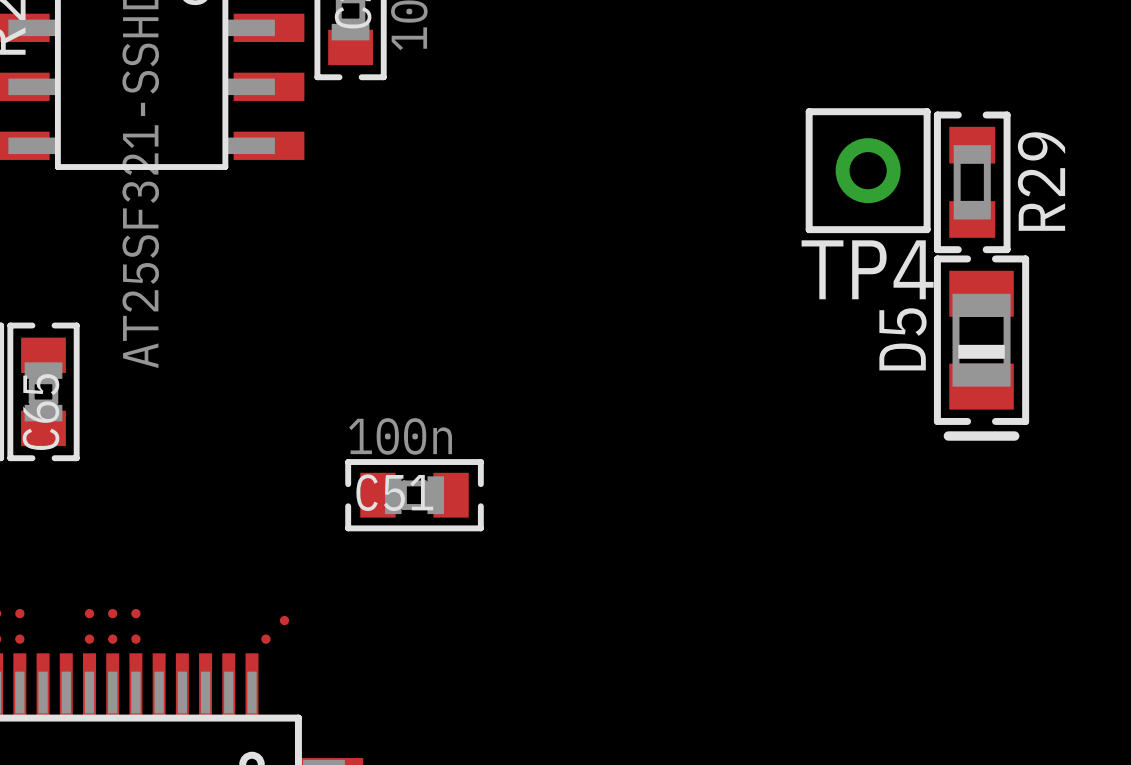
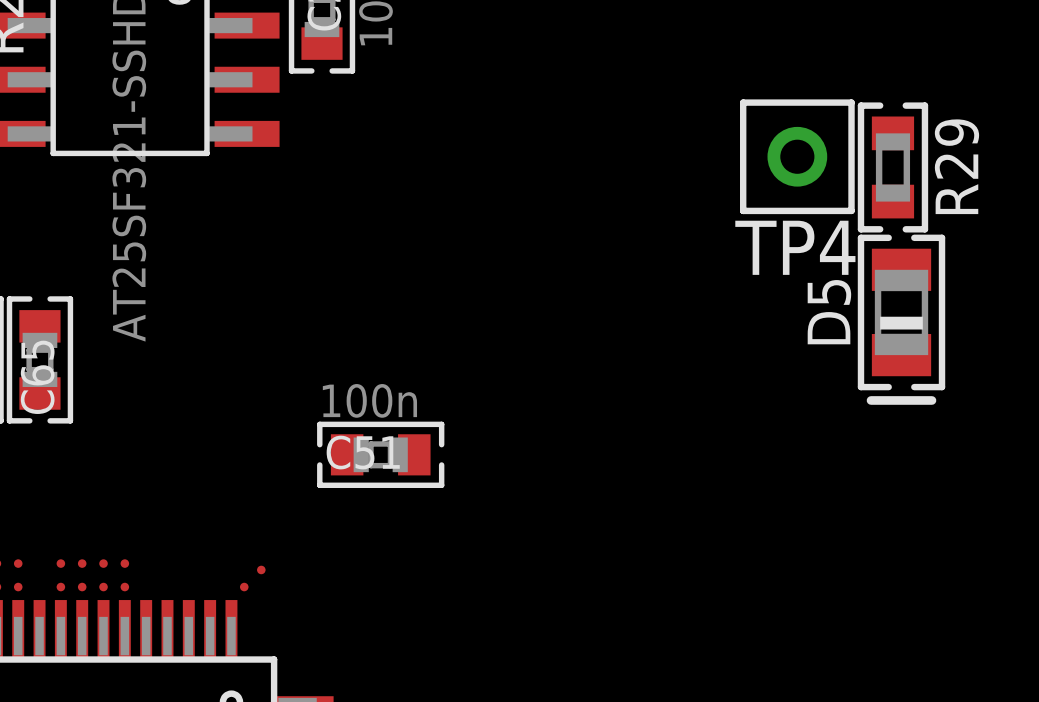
part: none -> (60, 563)
part: none -> (60, 587)

